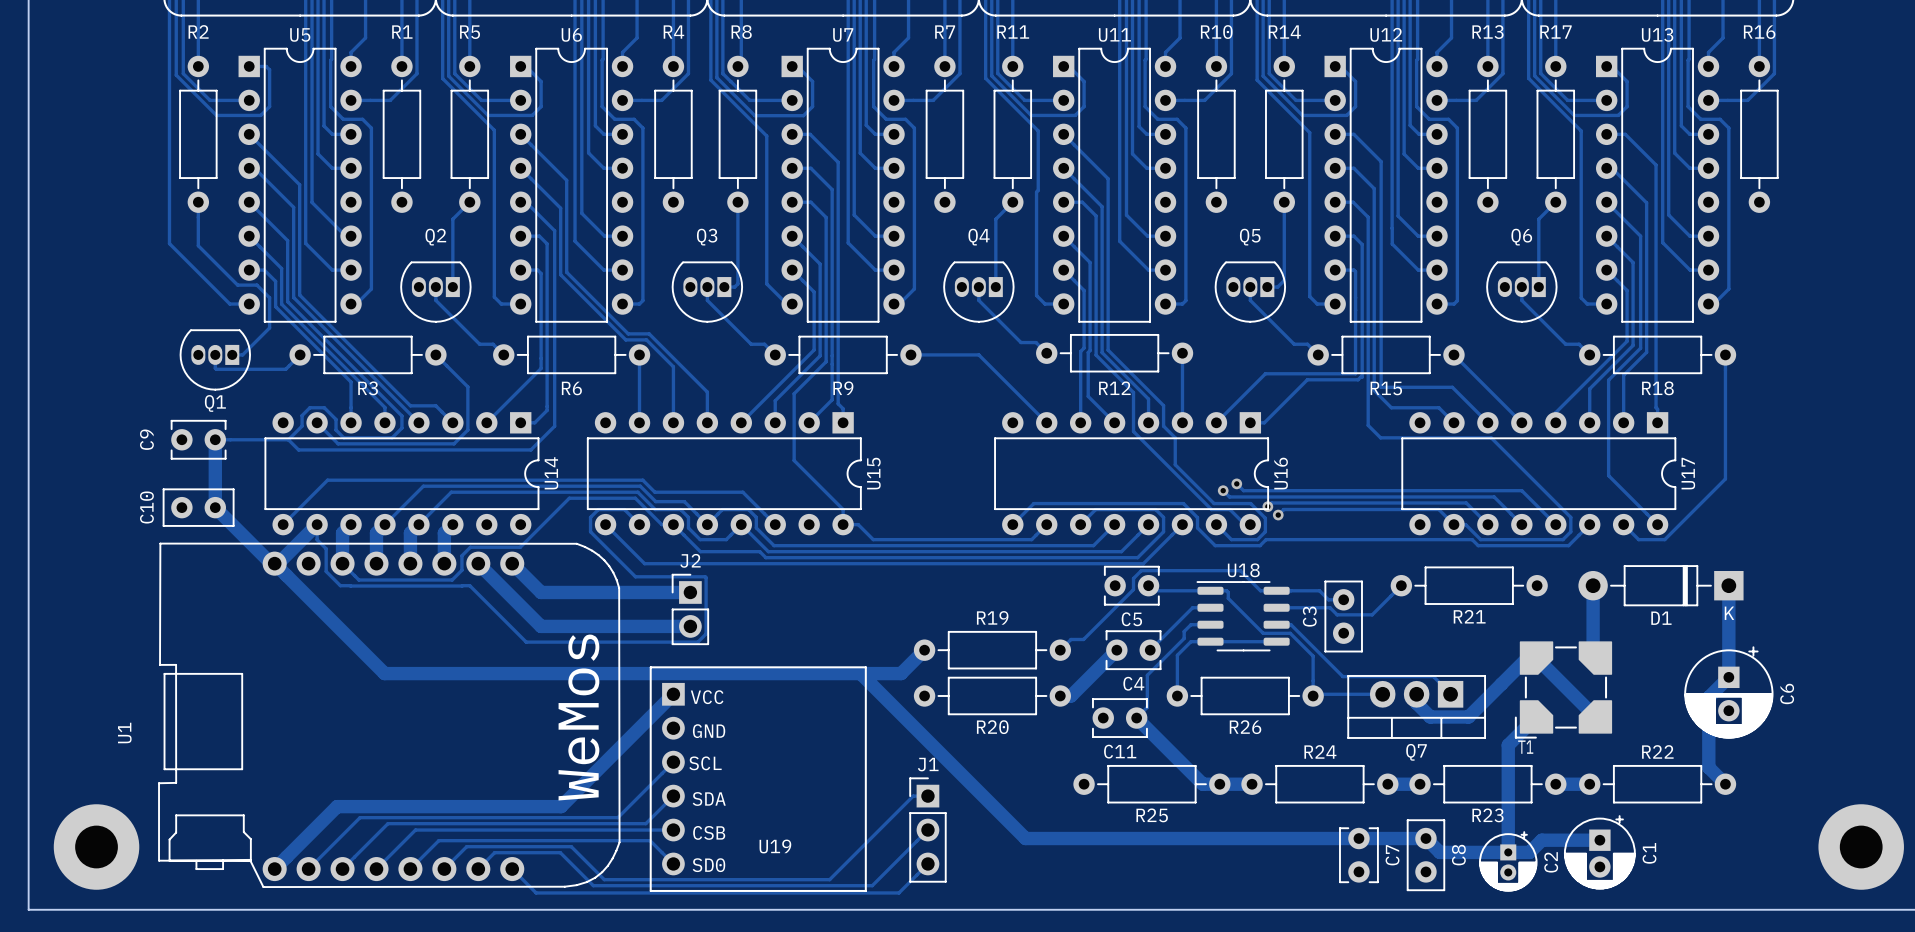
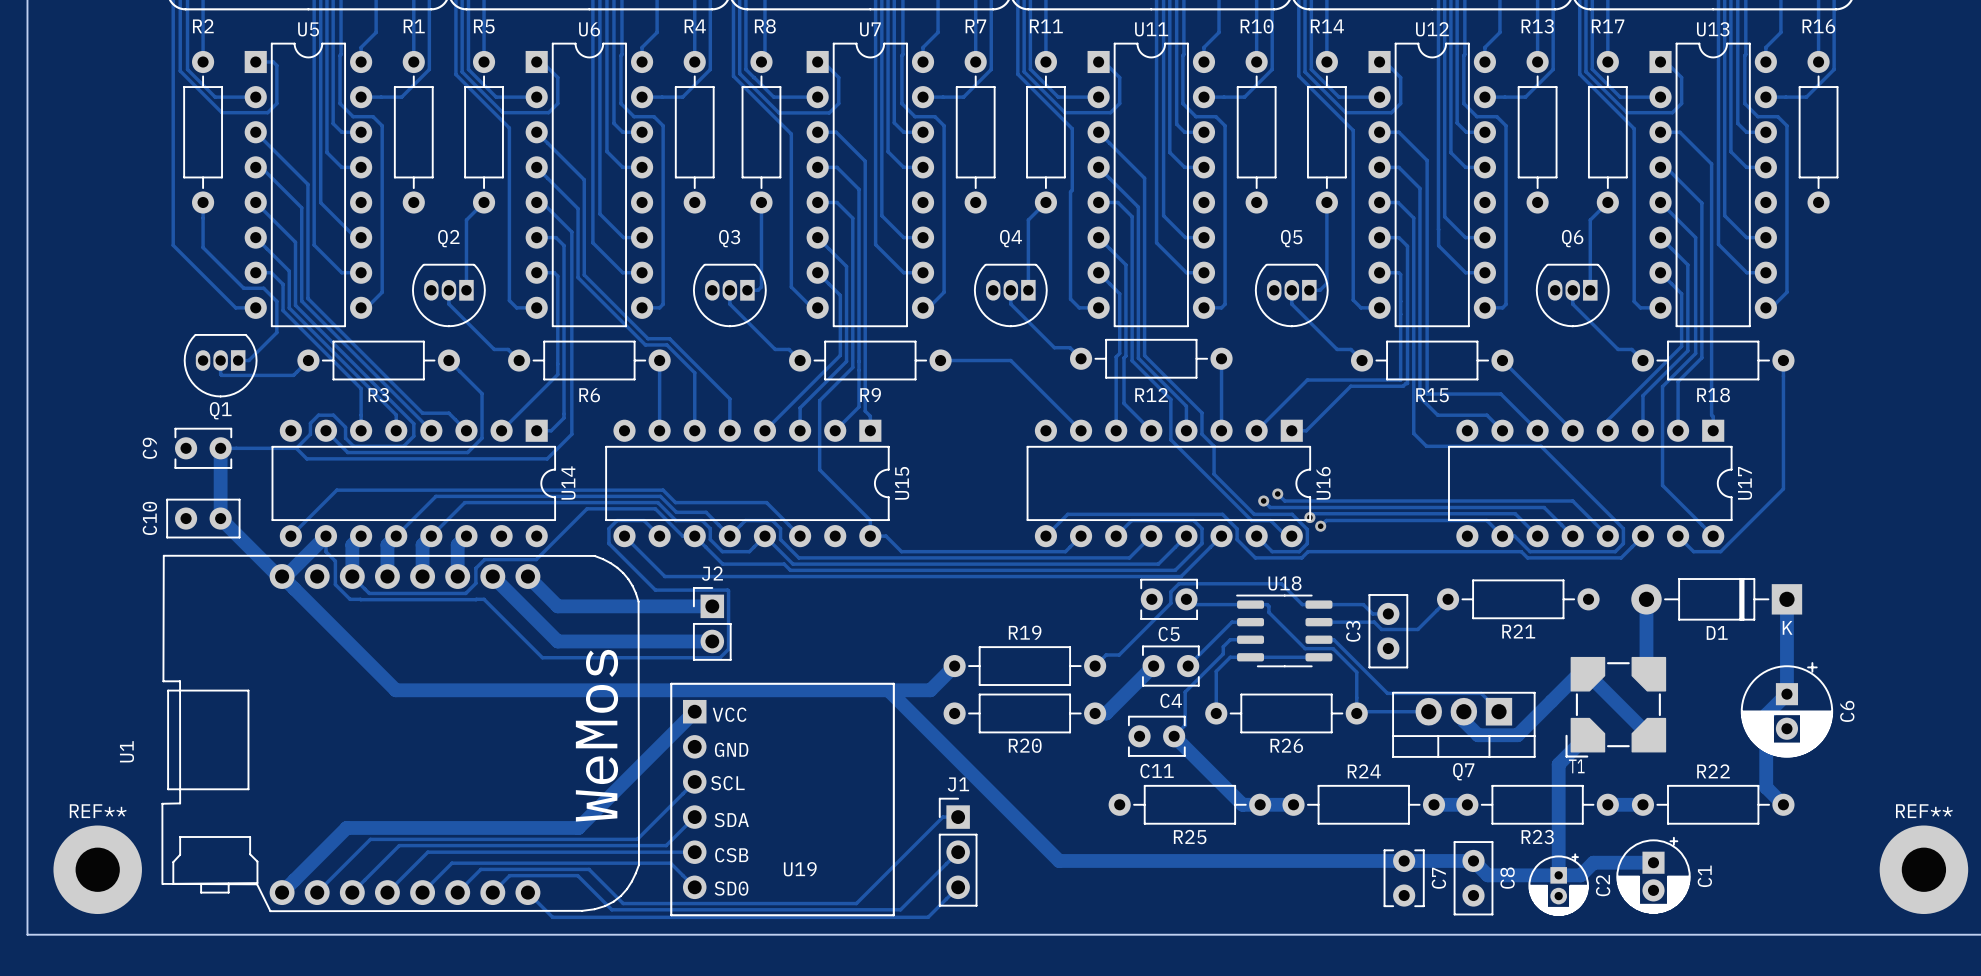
REF** name: none -> REF** (98, 811)
REF** name: none -> REF** (1924, 811)

